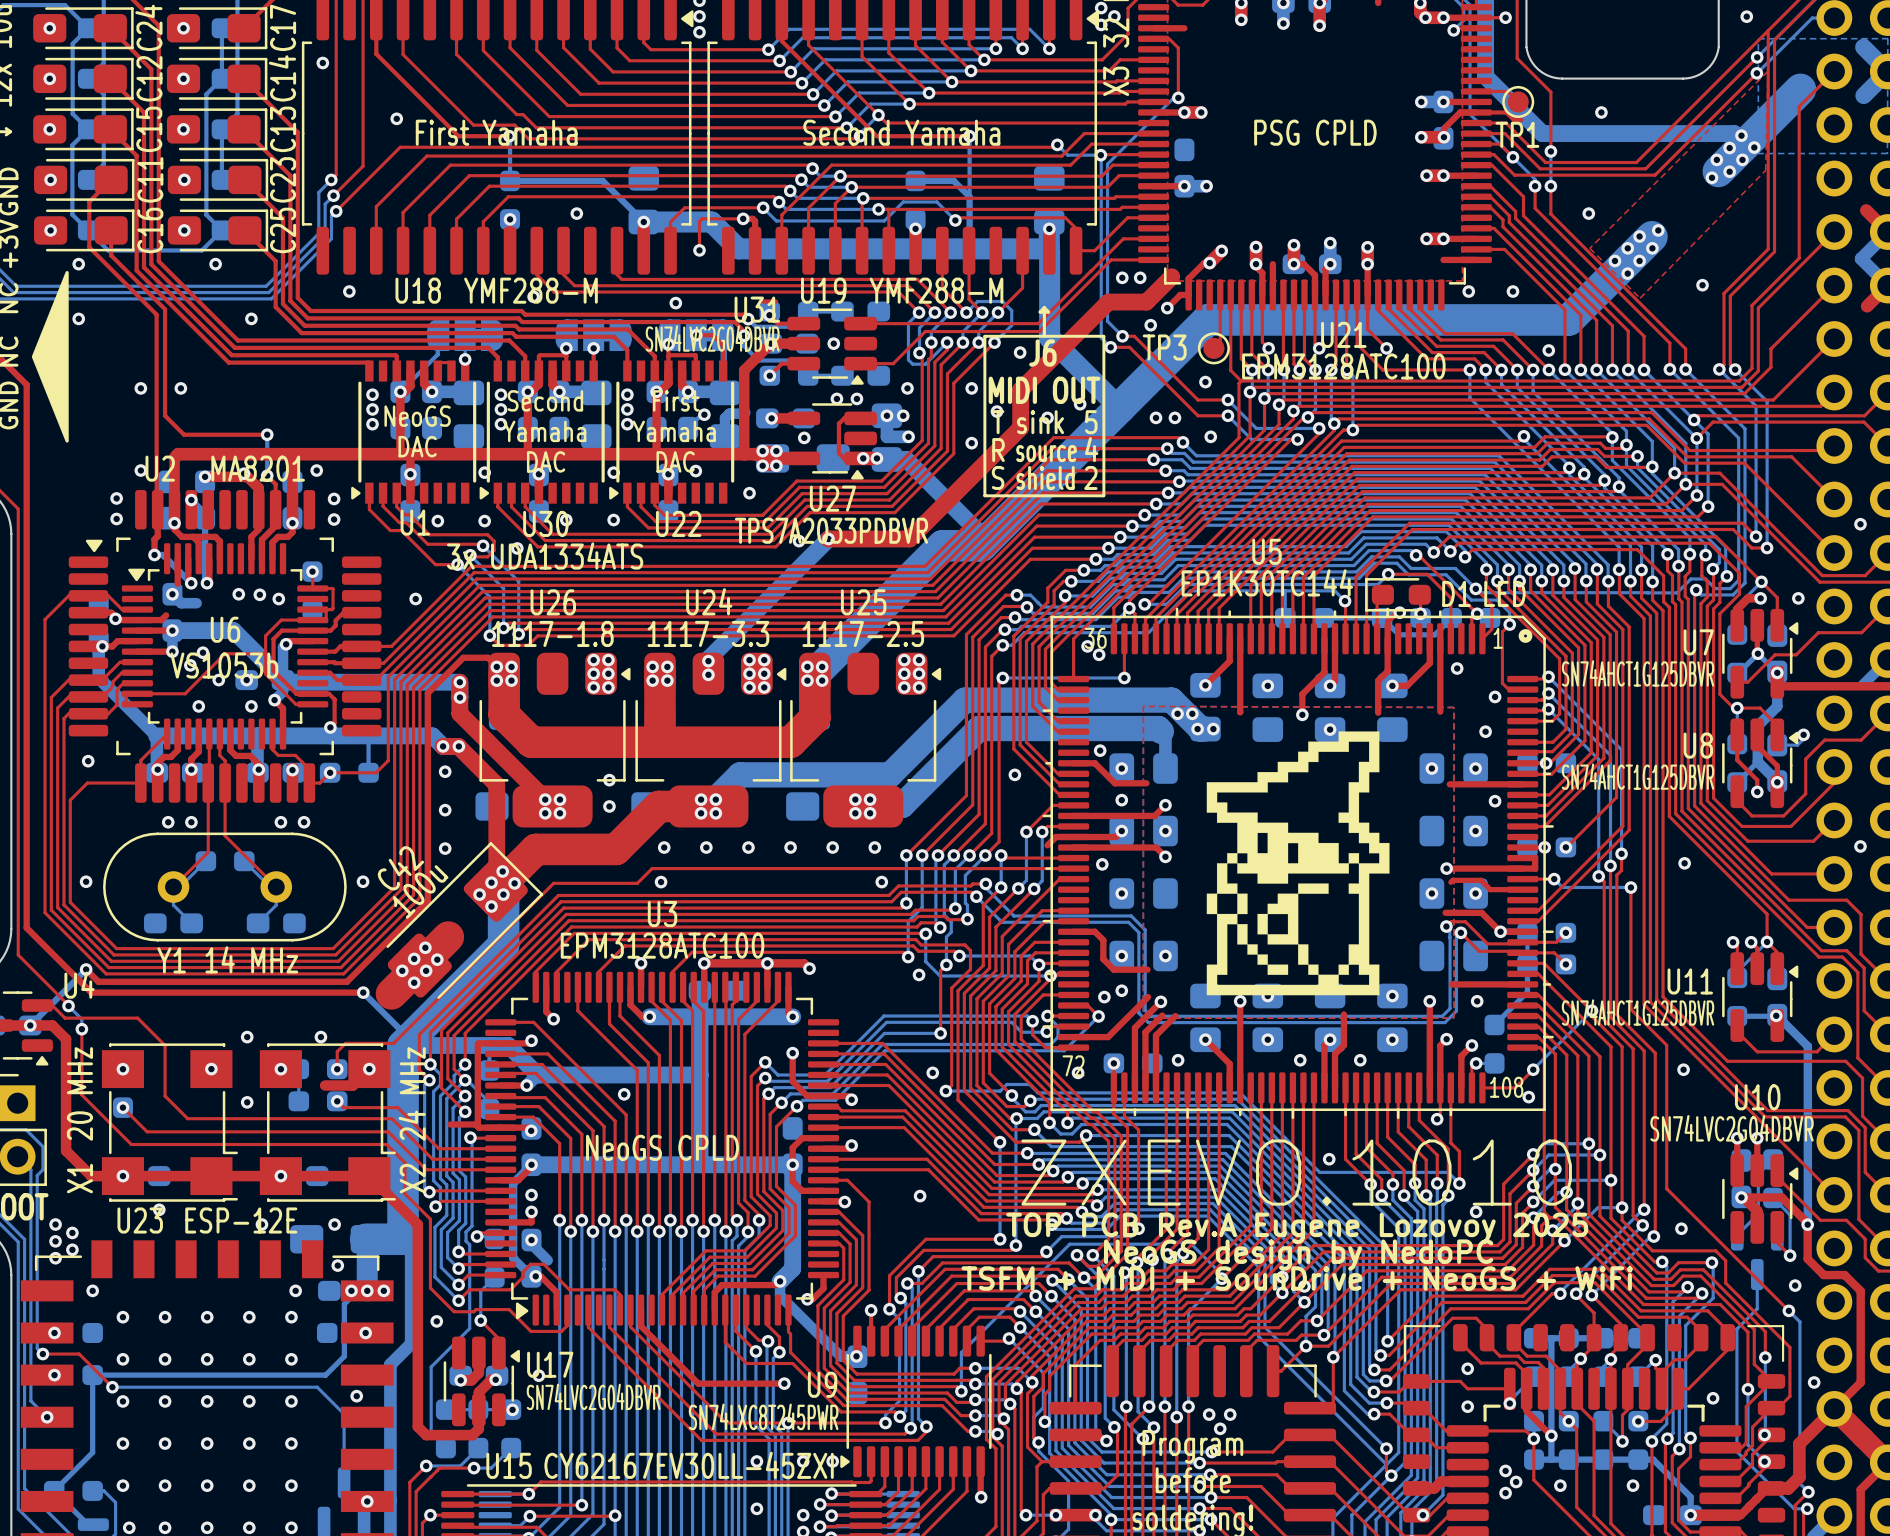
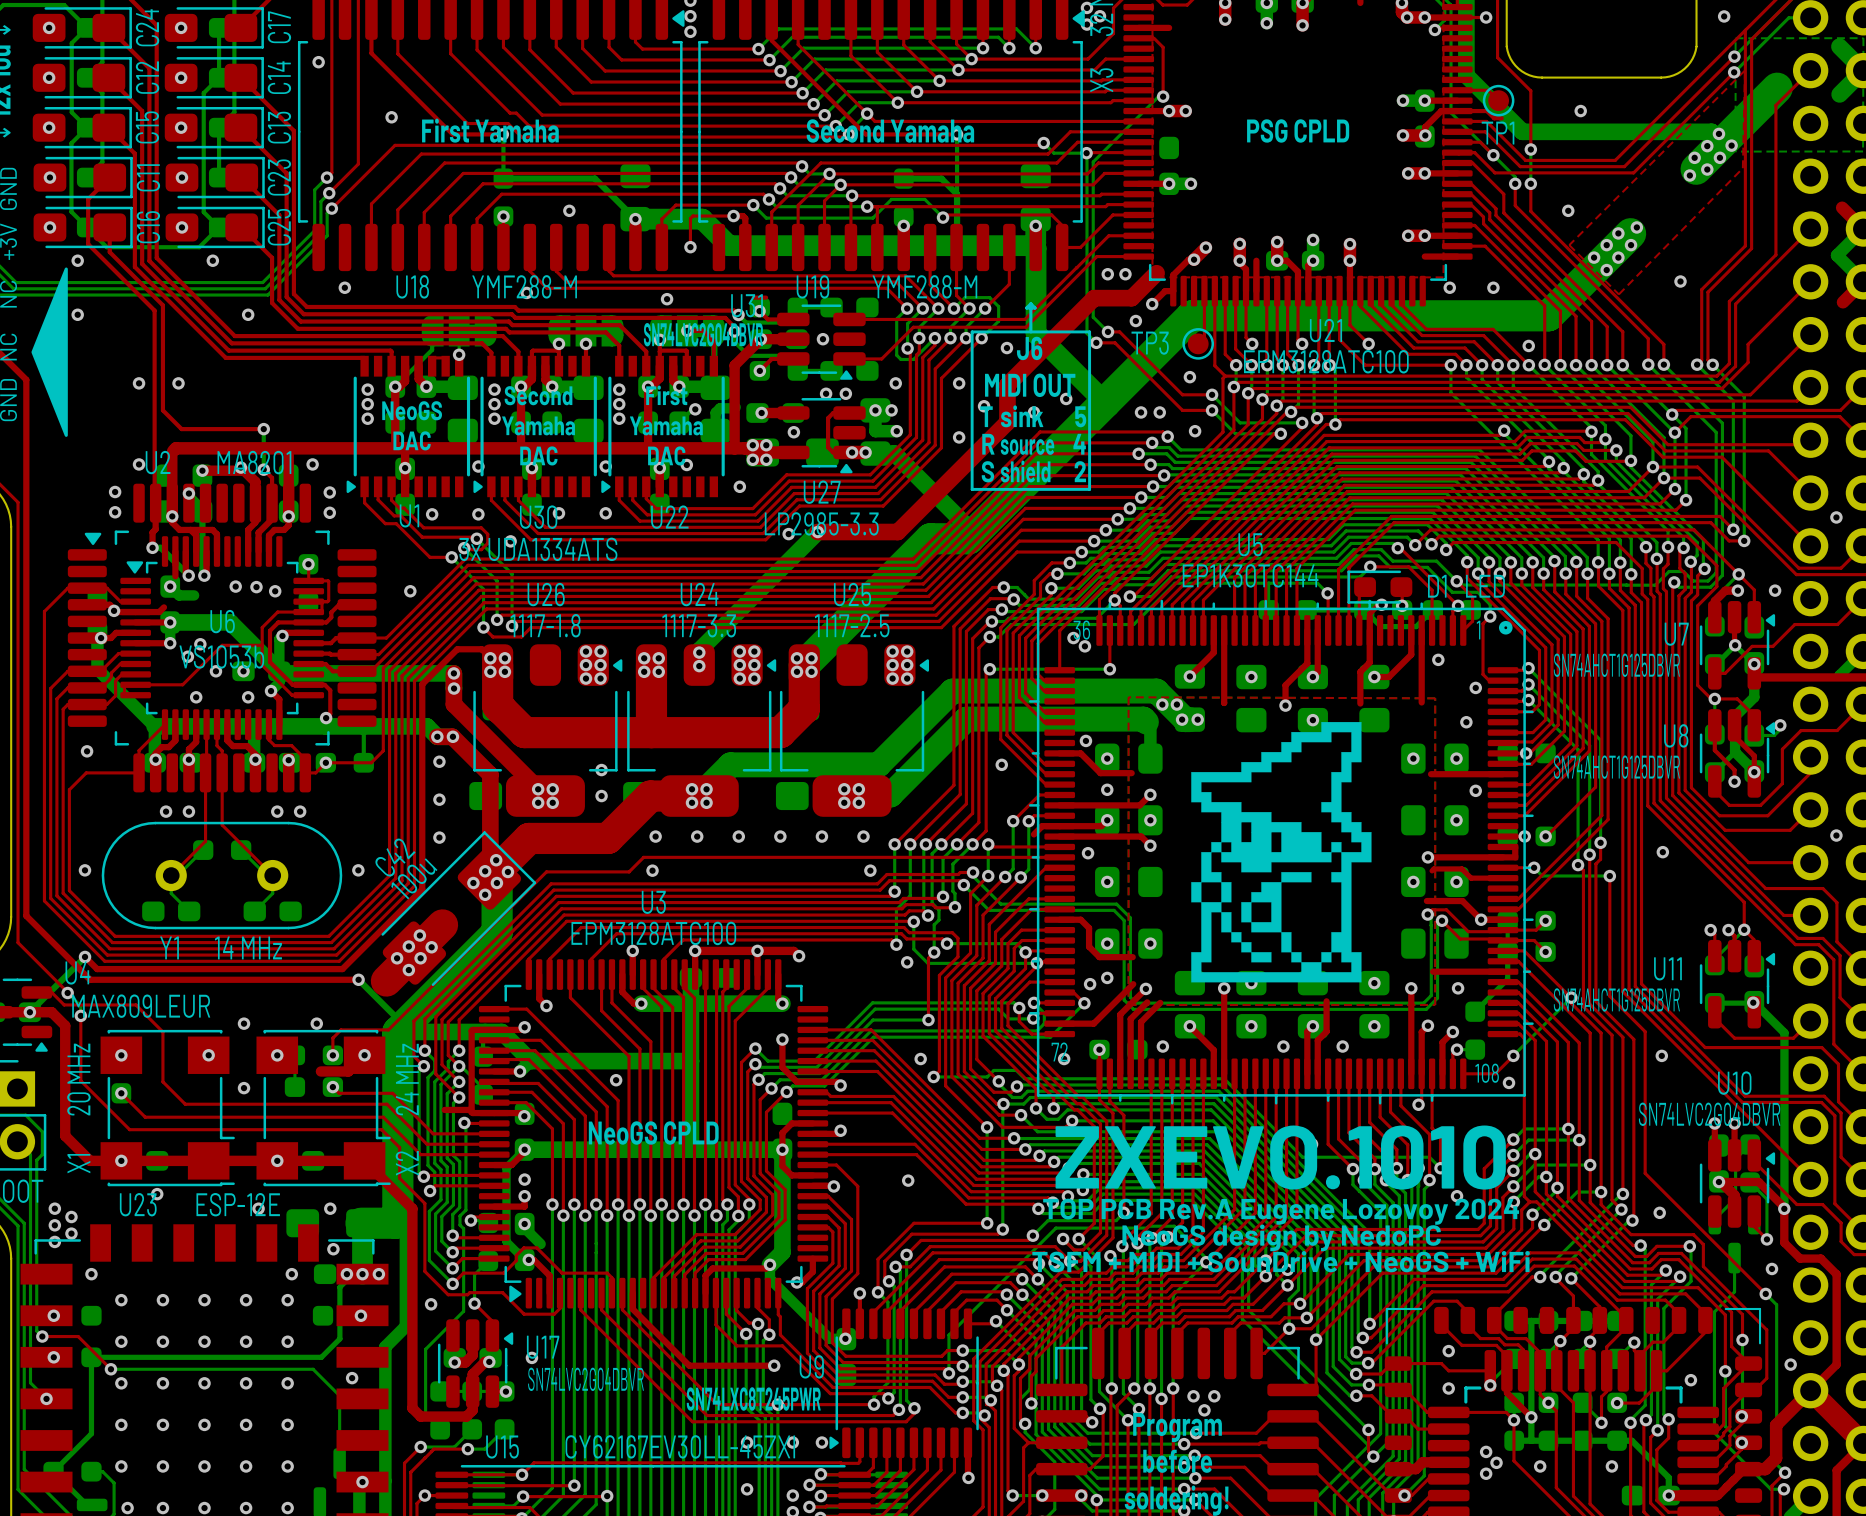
U27 text: TPS7A2033PDBVR (831, 530) -> LP2985-3.3 (821, 523)
U4 text: none -> MAX809LEUR (141, 1006)
text: TOP PCB Rev.A Eugene Lozovoy 2025 (1297, 1228) -> TOP PCB Rev.A Eugene Lozovoy 2024 (1281, 1211)

